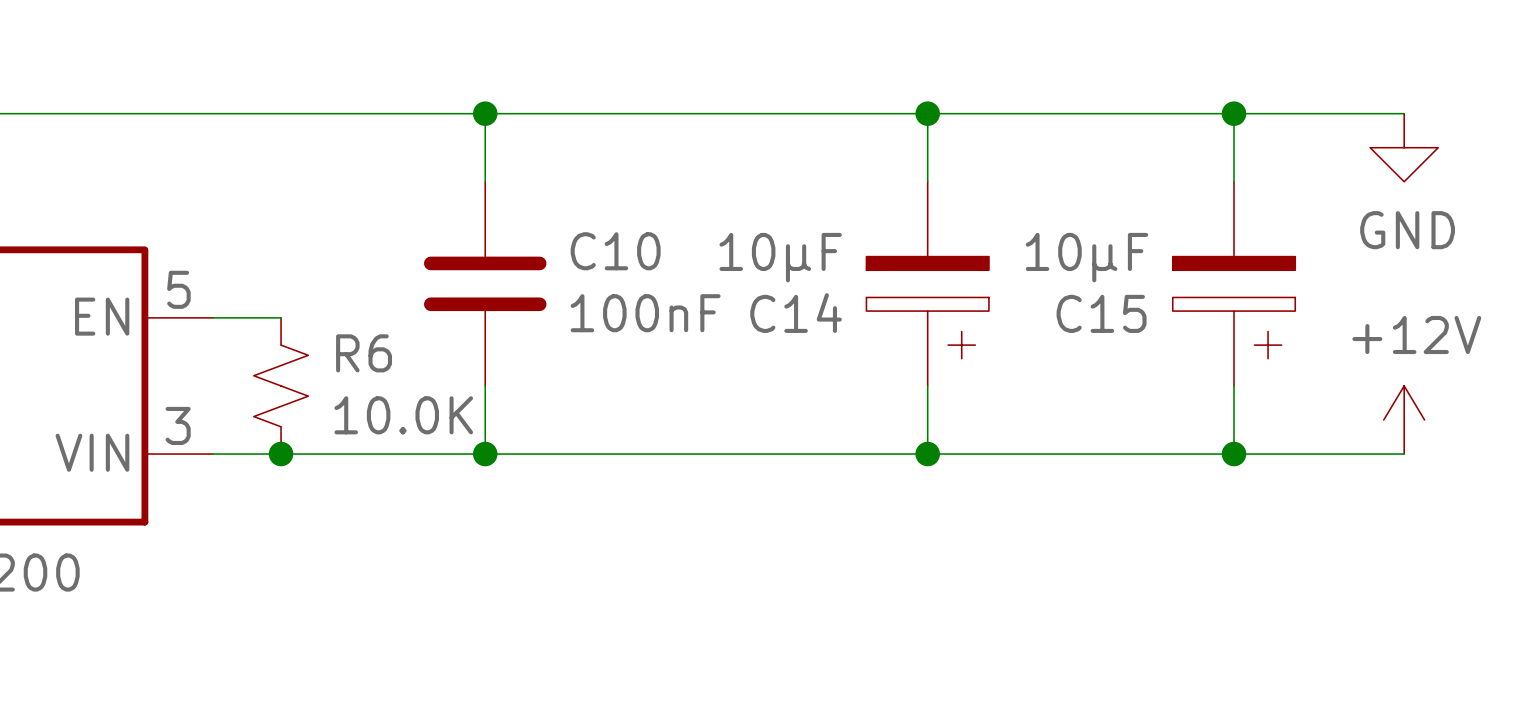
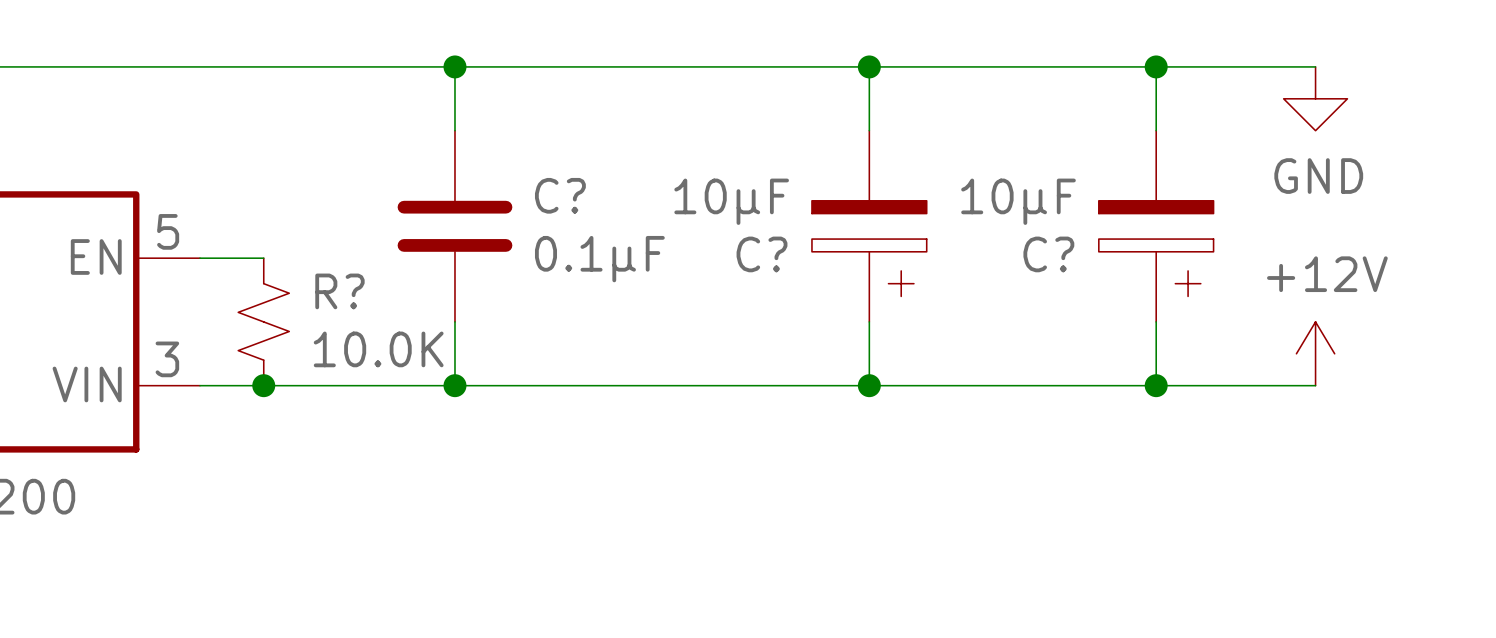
C10 name: C10 (615, 251) -> C? (560, 195)
C10 value: 100nF (645, 313) -> 0.1μF (599, 259)
C14 name: C14 (796, 313) -> C? (762, 254)
C15 name: C15 (1101, 313) -> C? (1048, 254)
R6 name: R6 (364, 353) -> R? (339, 291)

